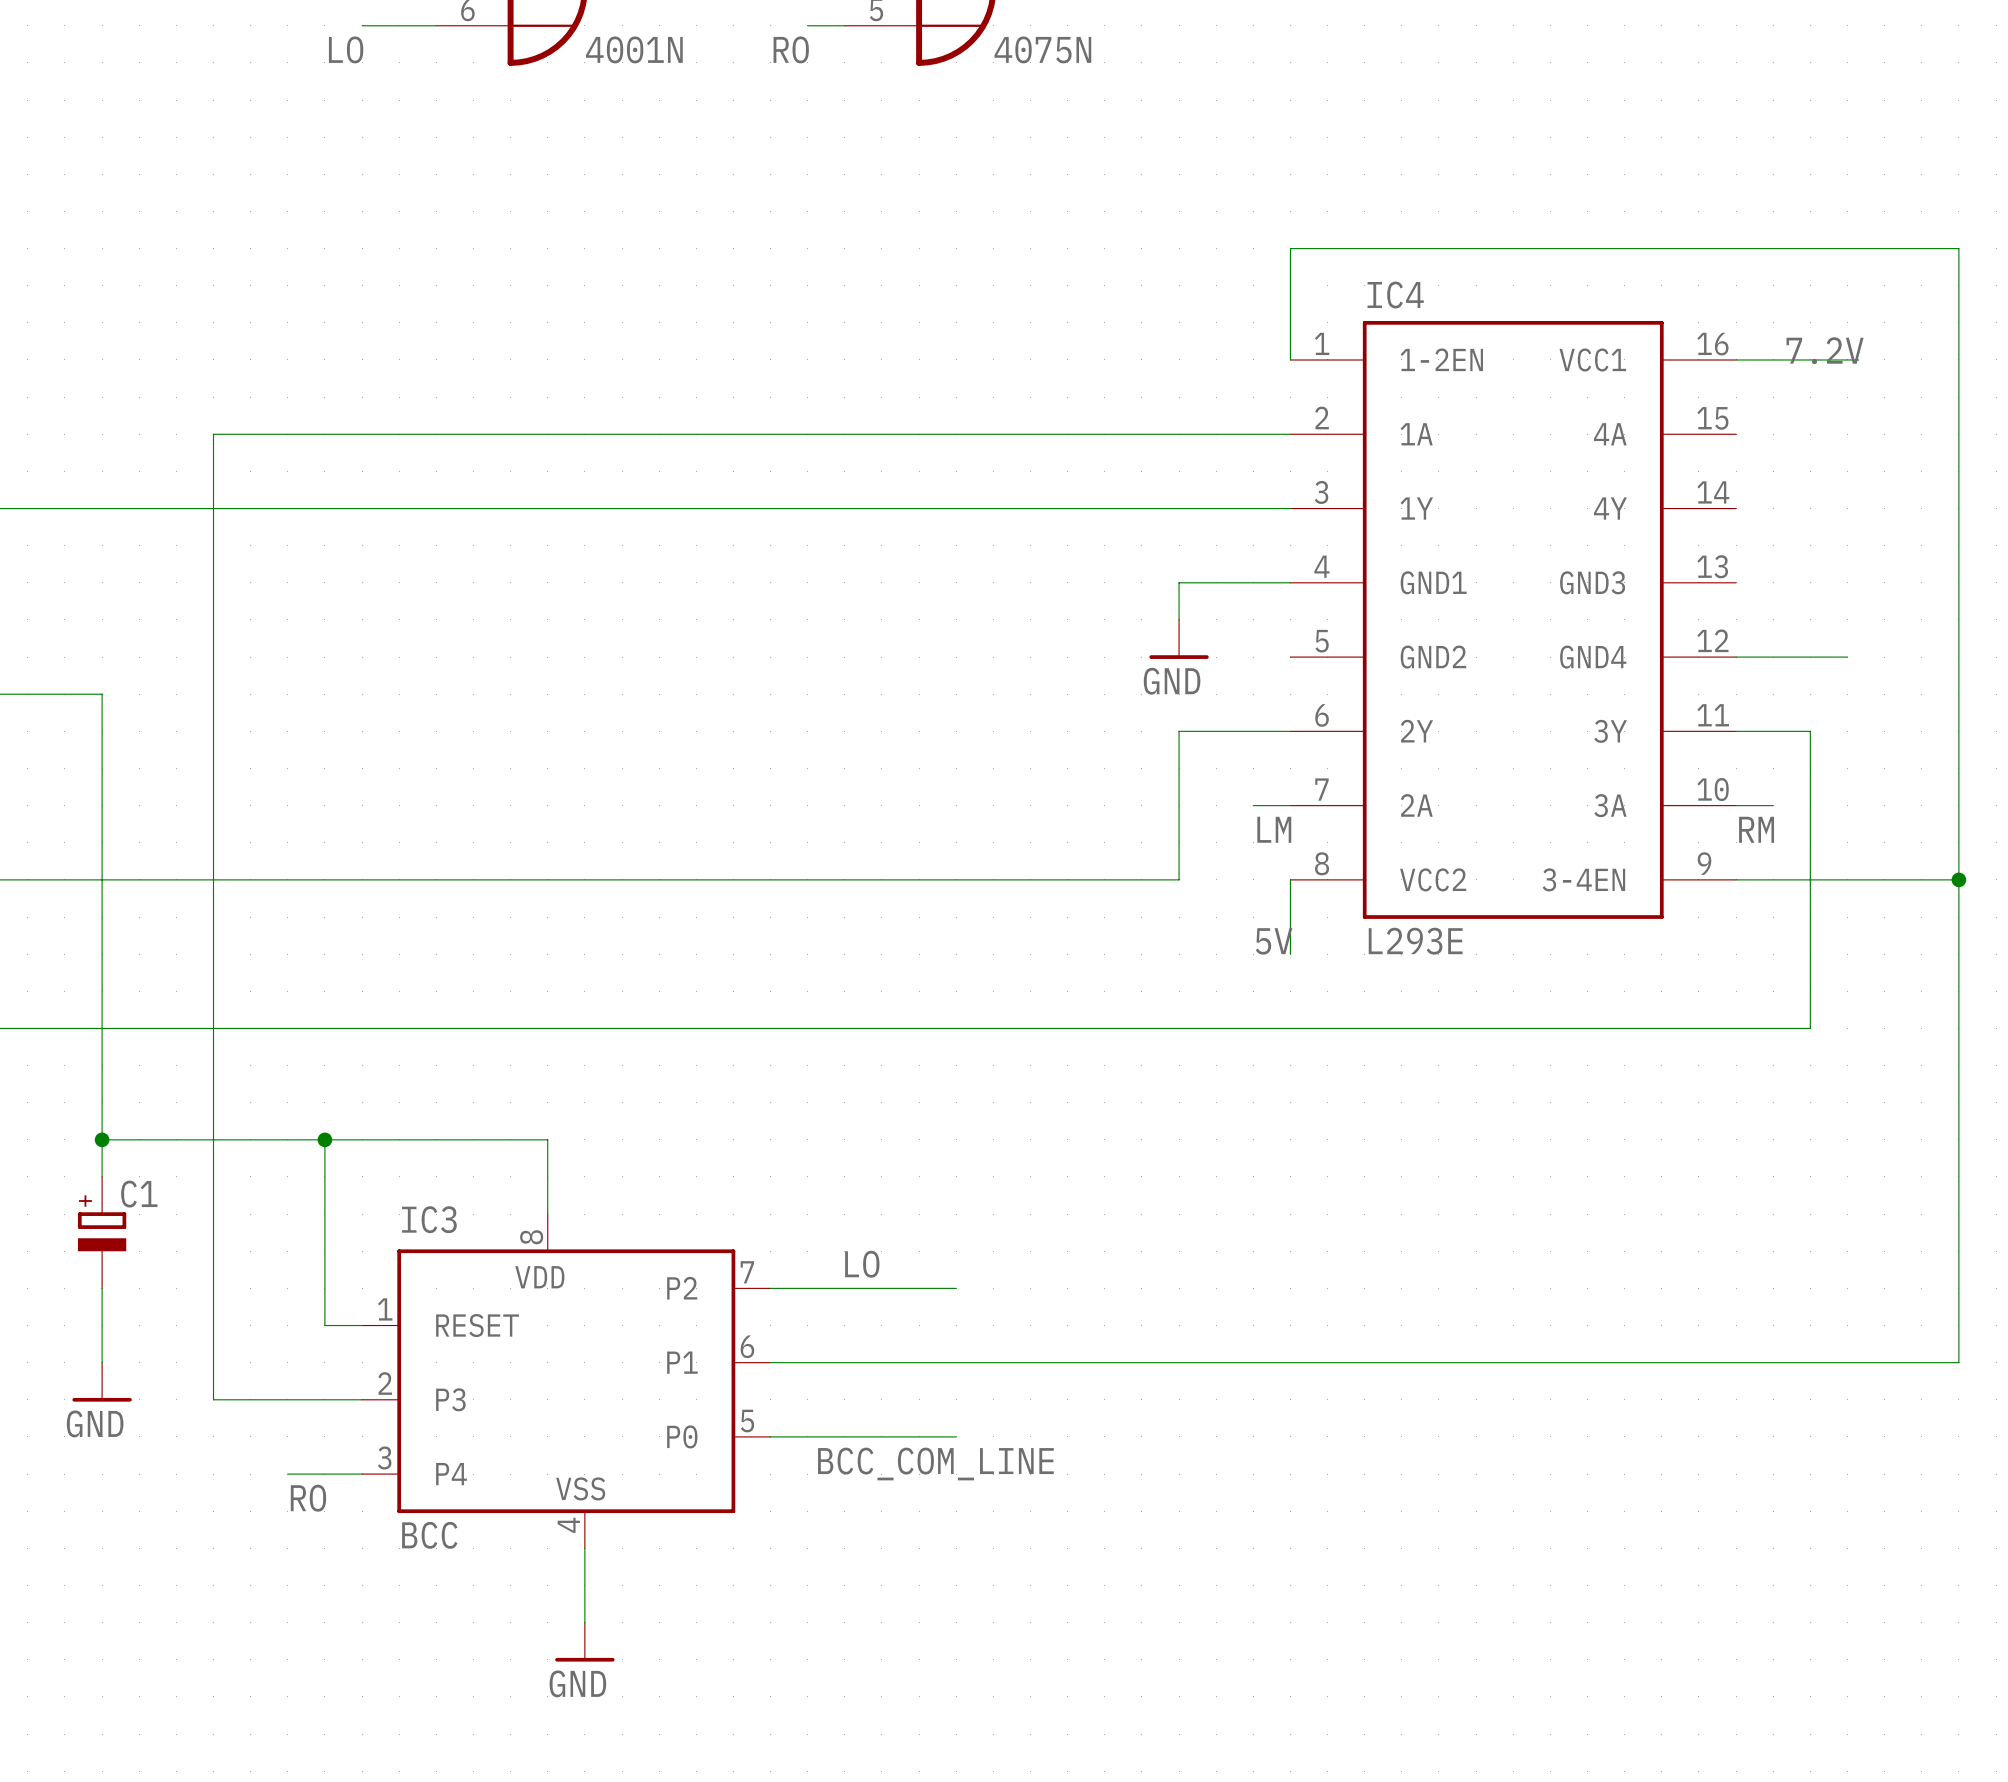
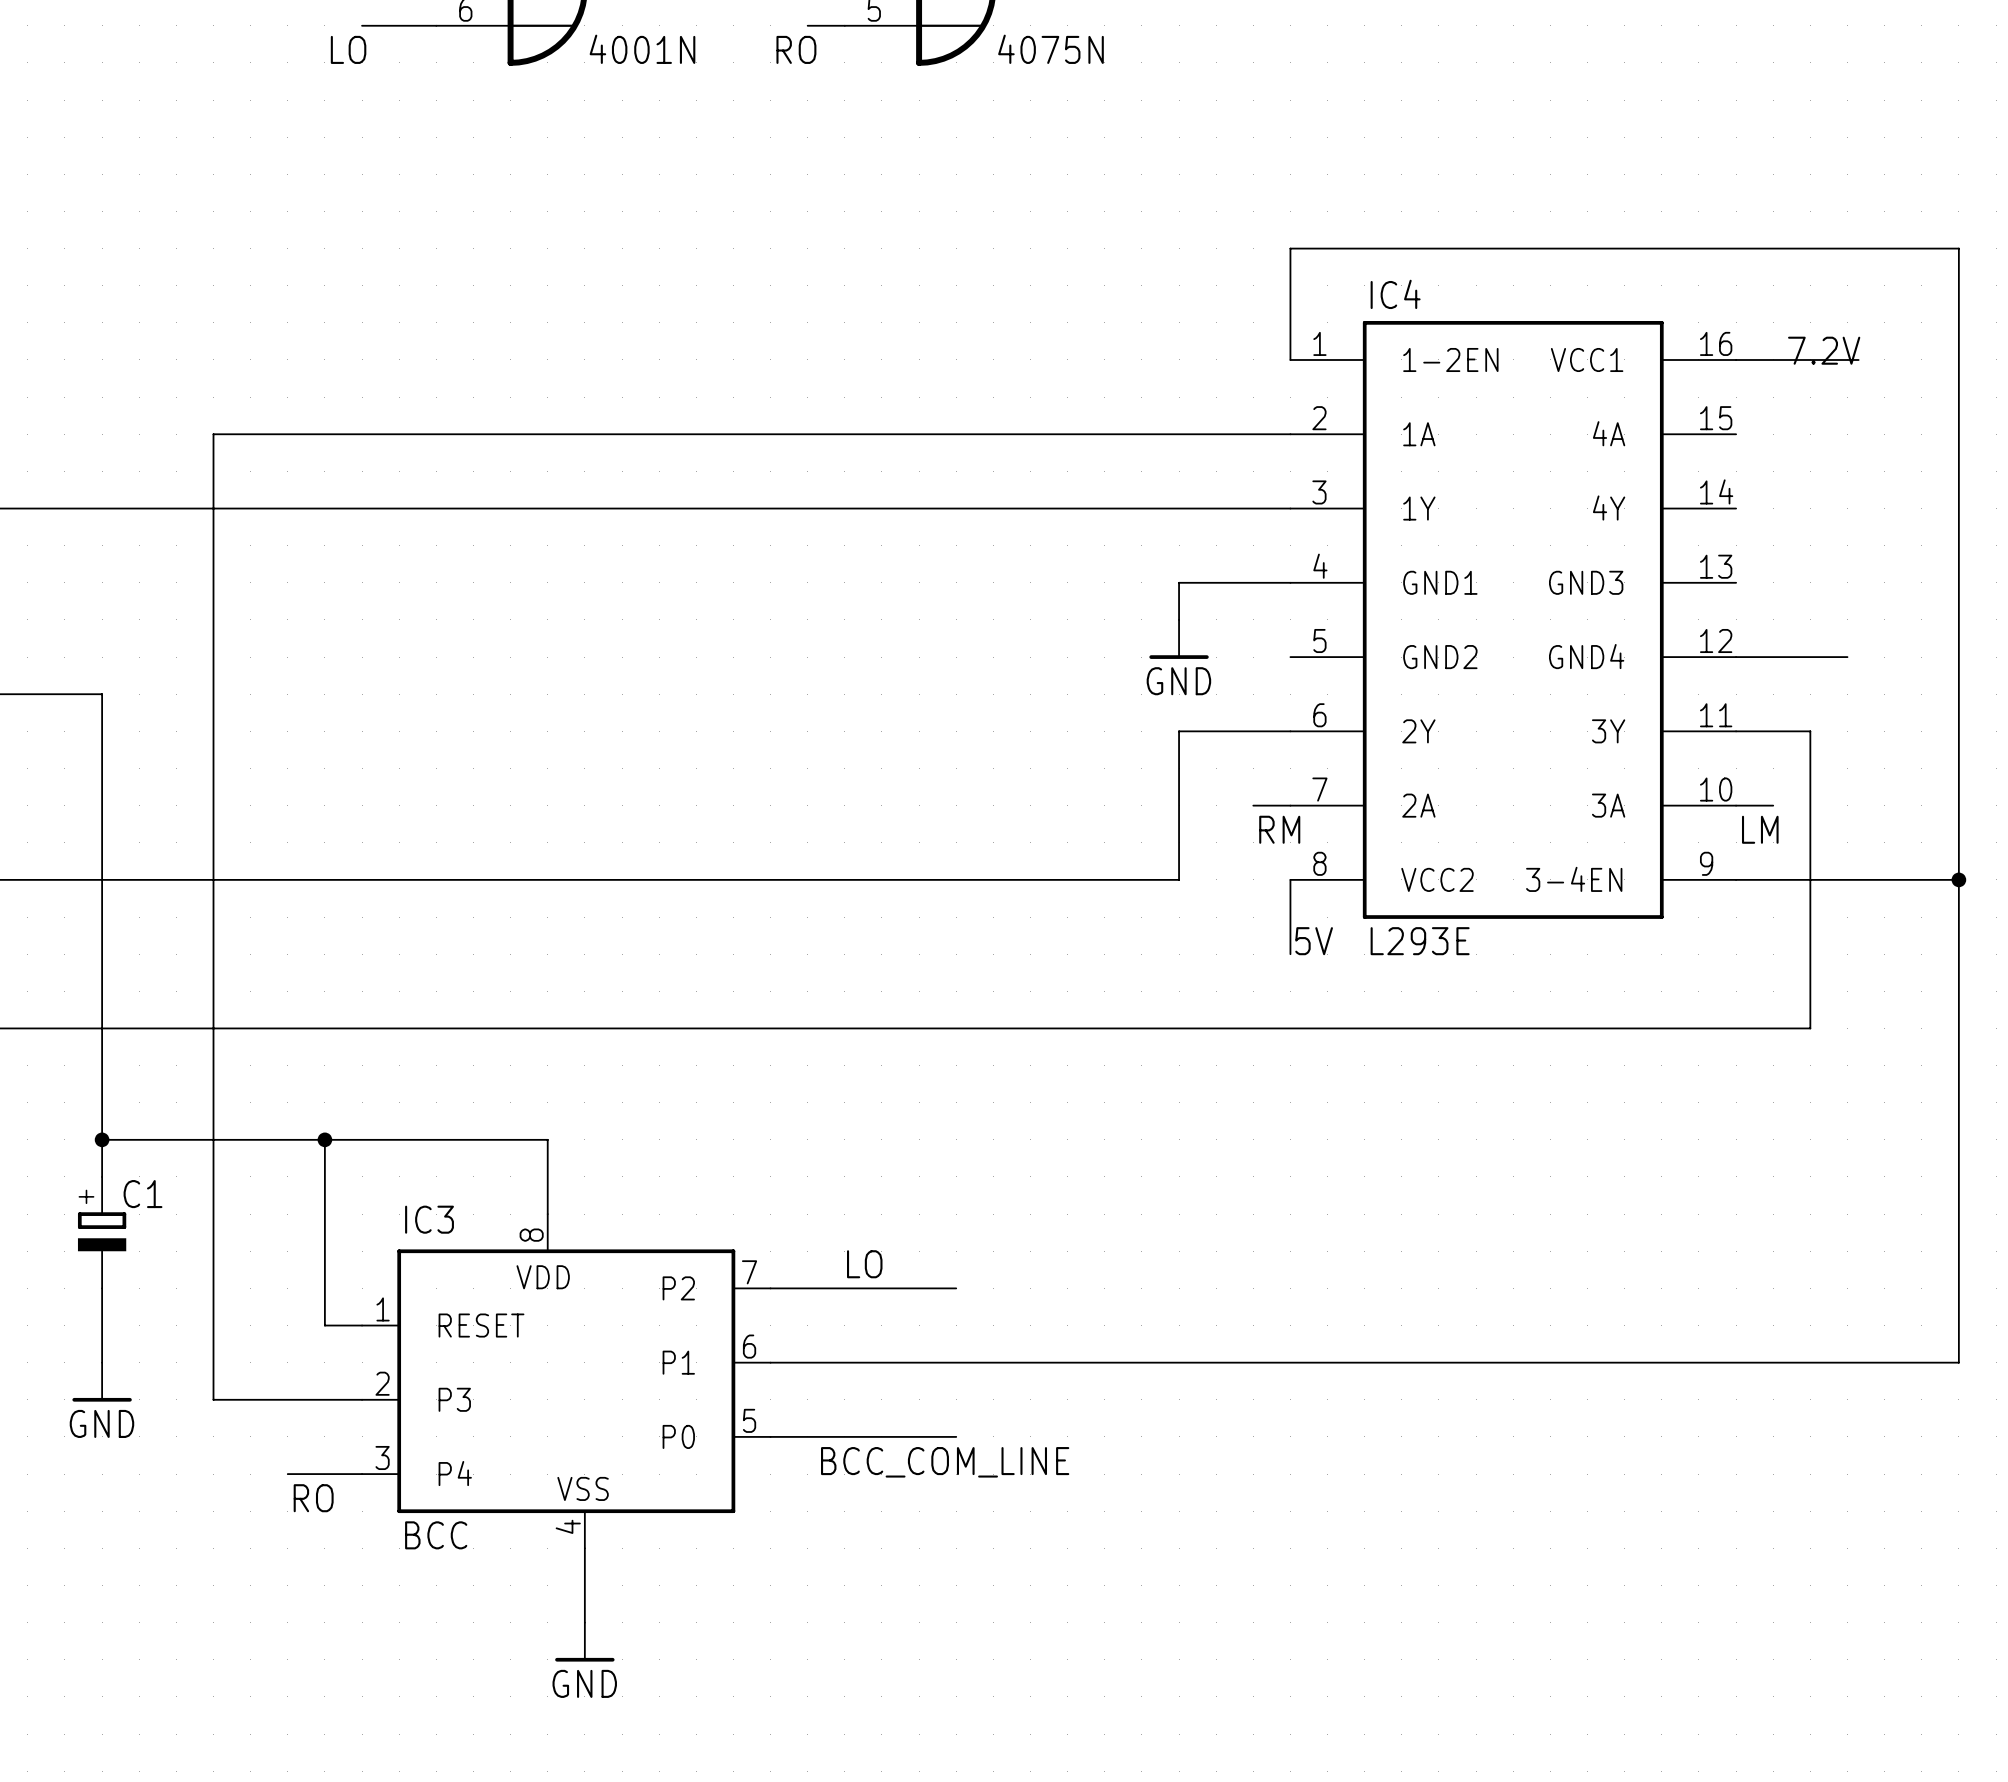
label: LM (1274, 829) -> RM (1279, 829)
label: RM (1756, 829) -> LM (1760, 829)
label position: 5V (1274, 941) -> 5V (1314, 941)

